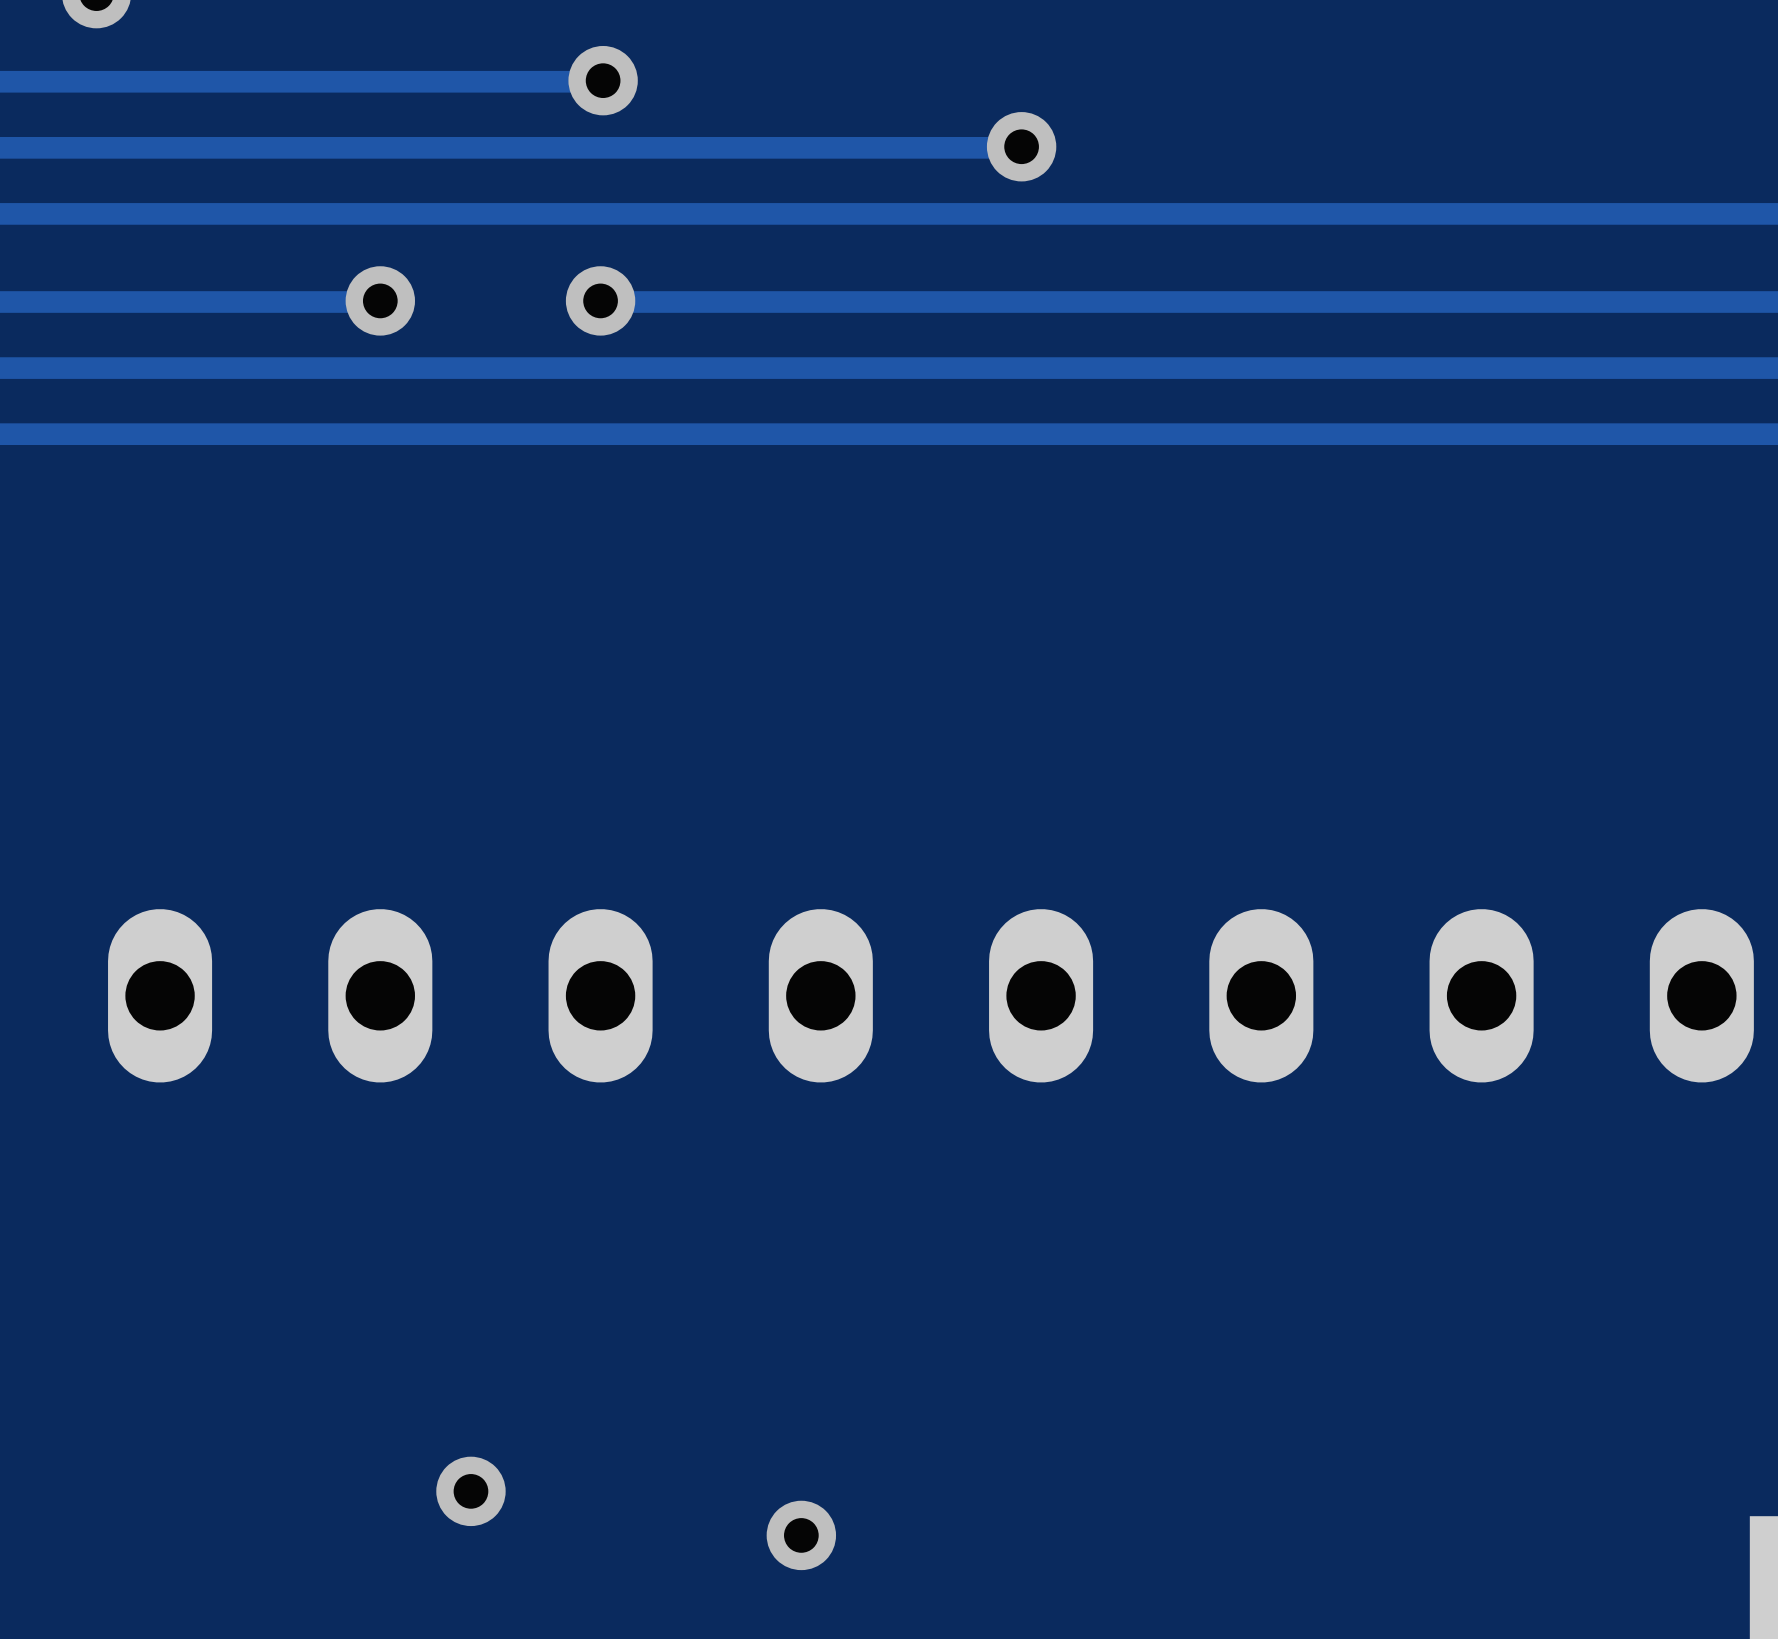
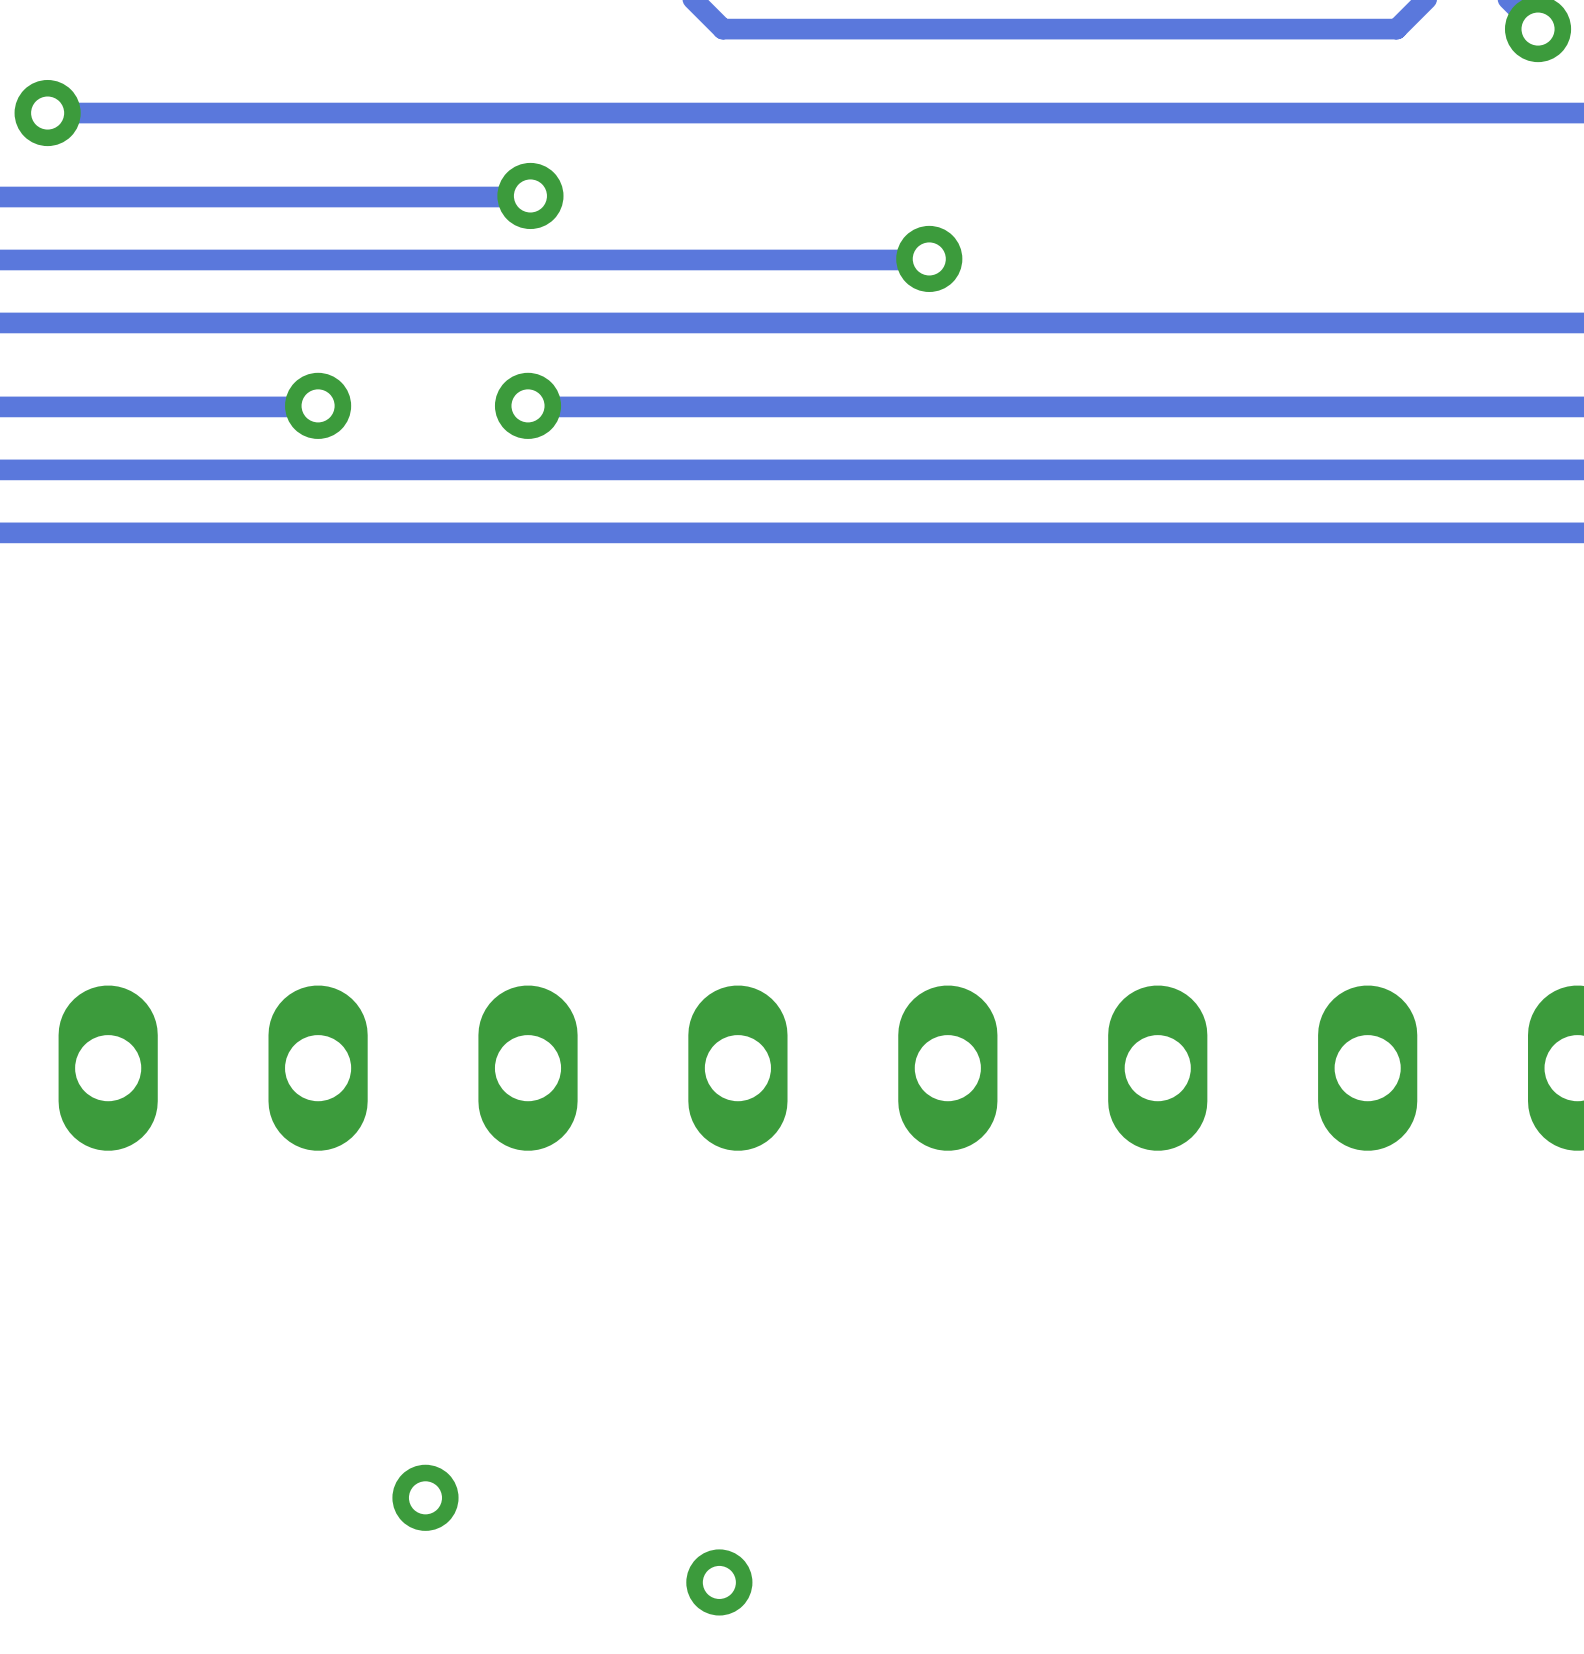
via position: (470, 1491) -> (425, 1497)

